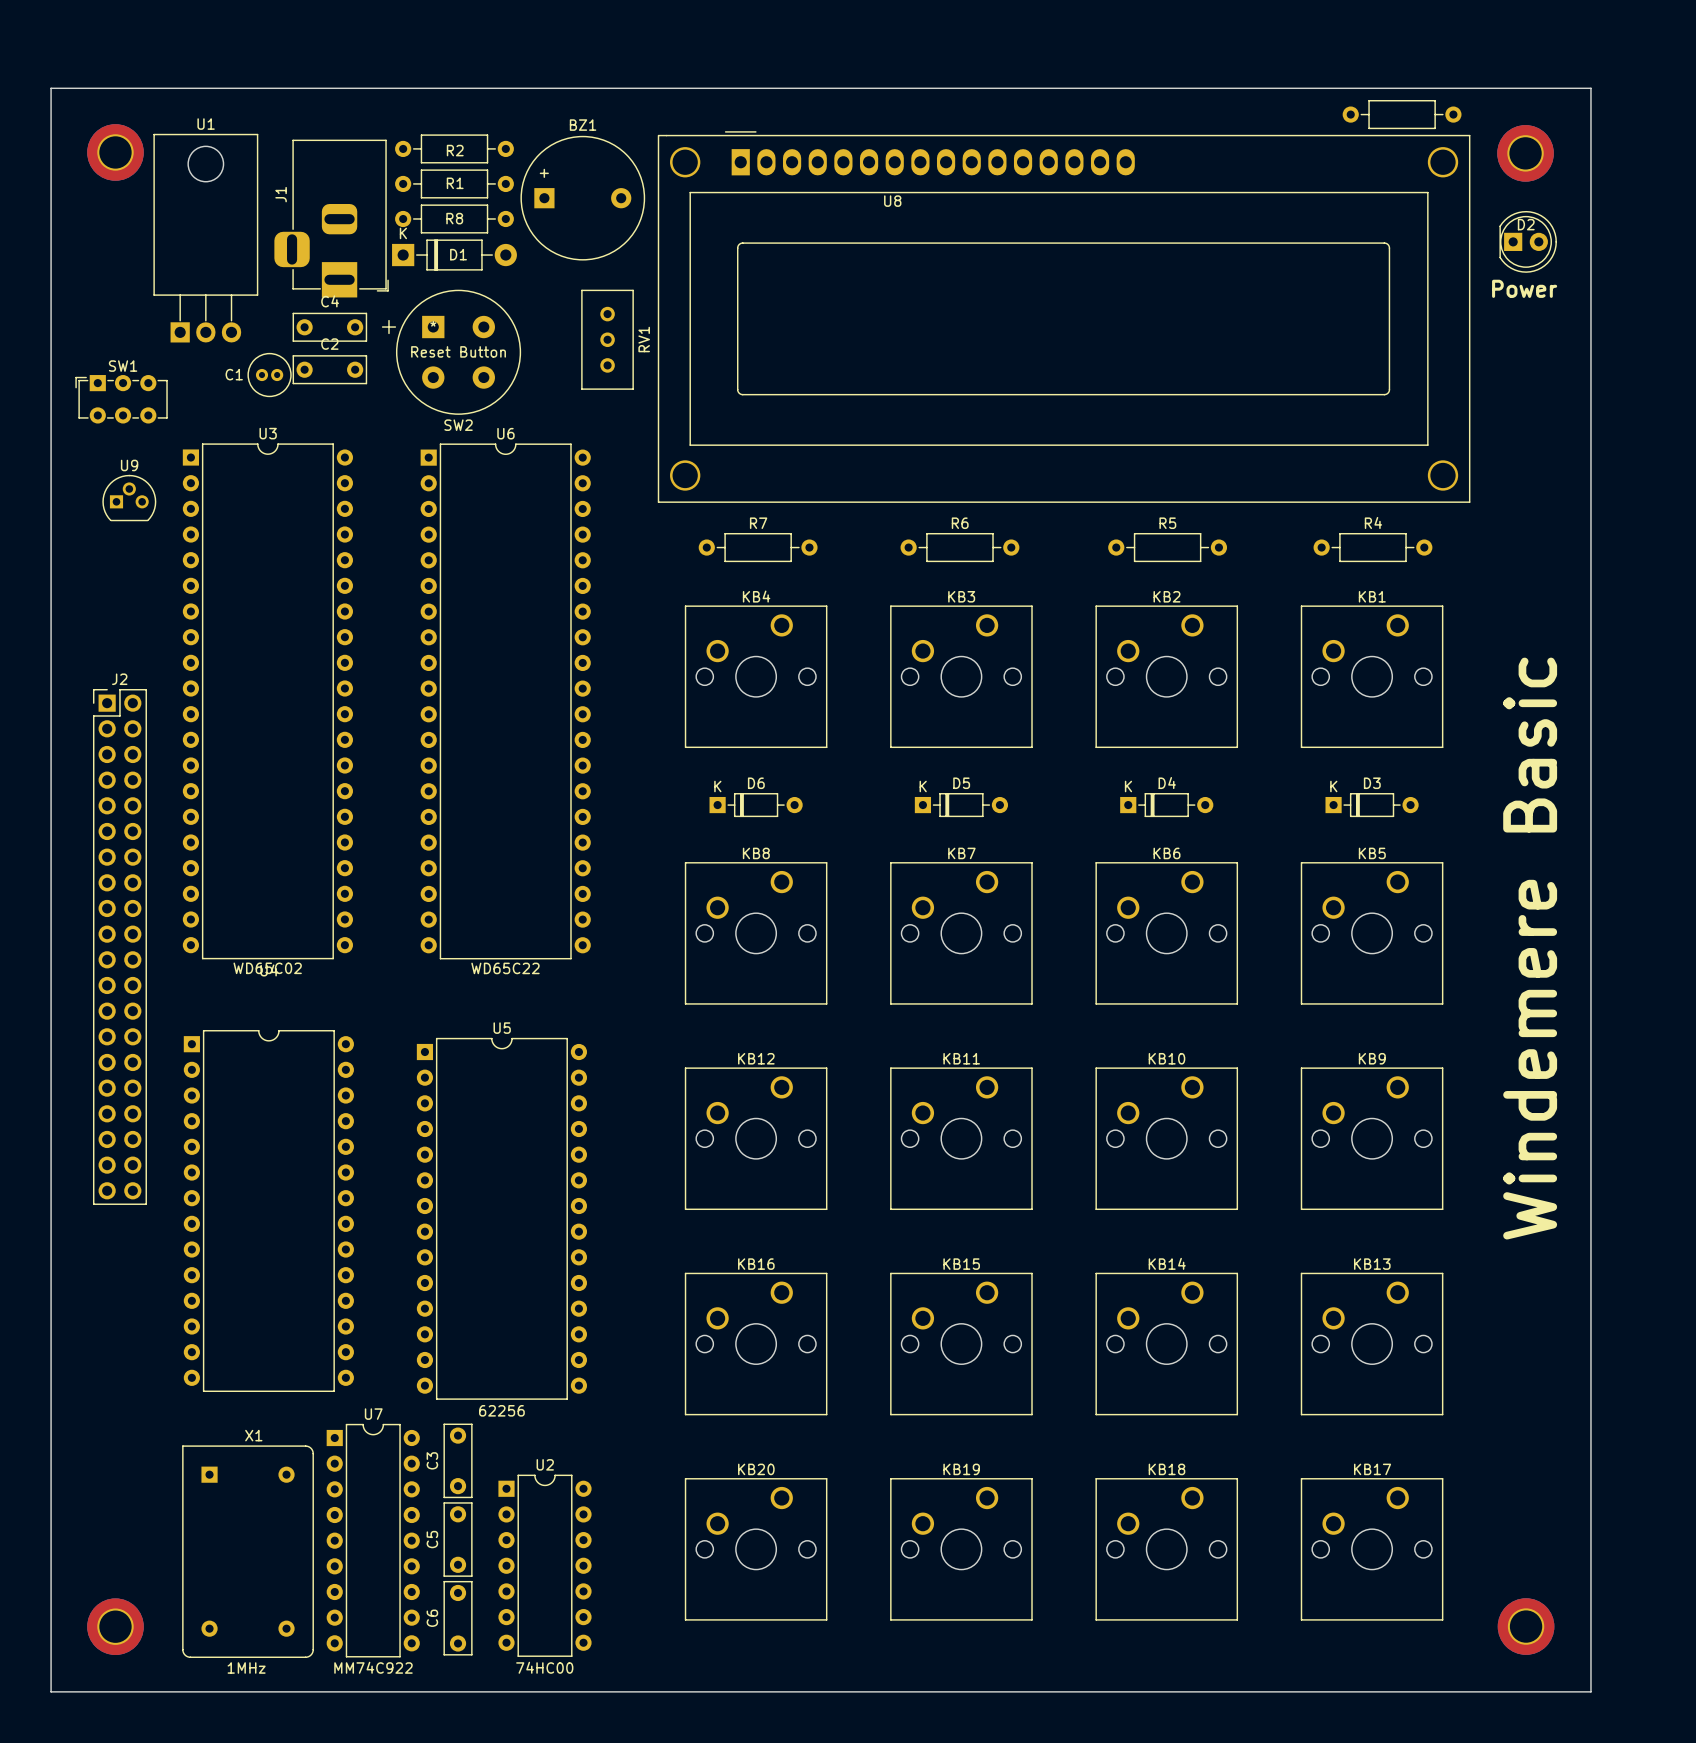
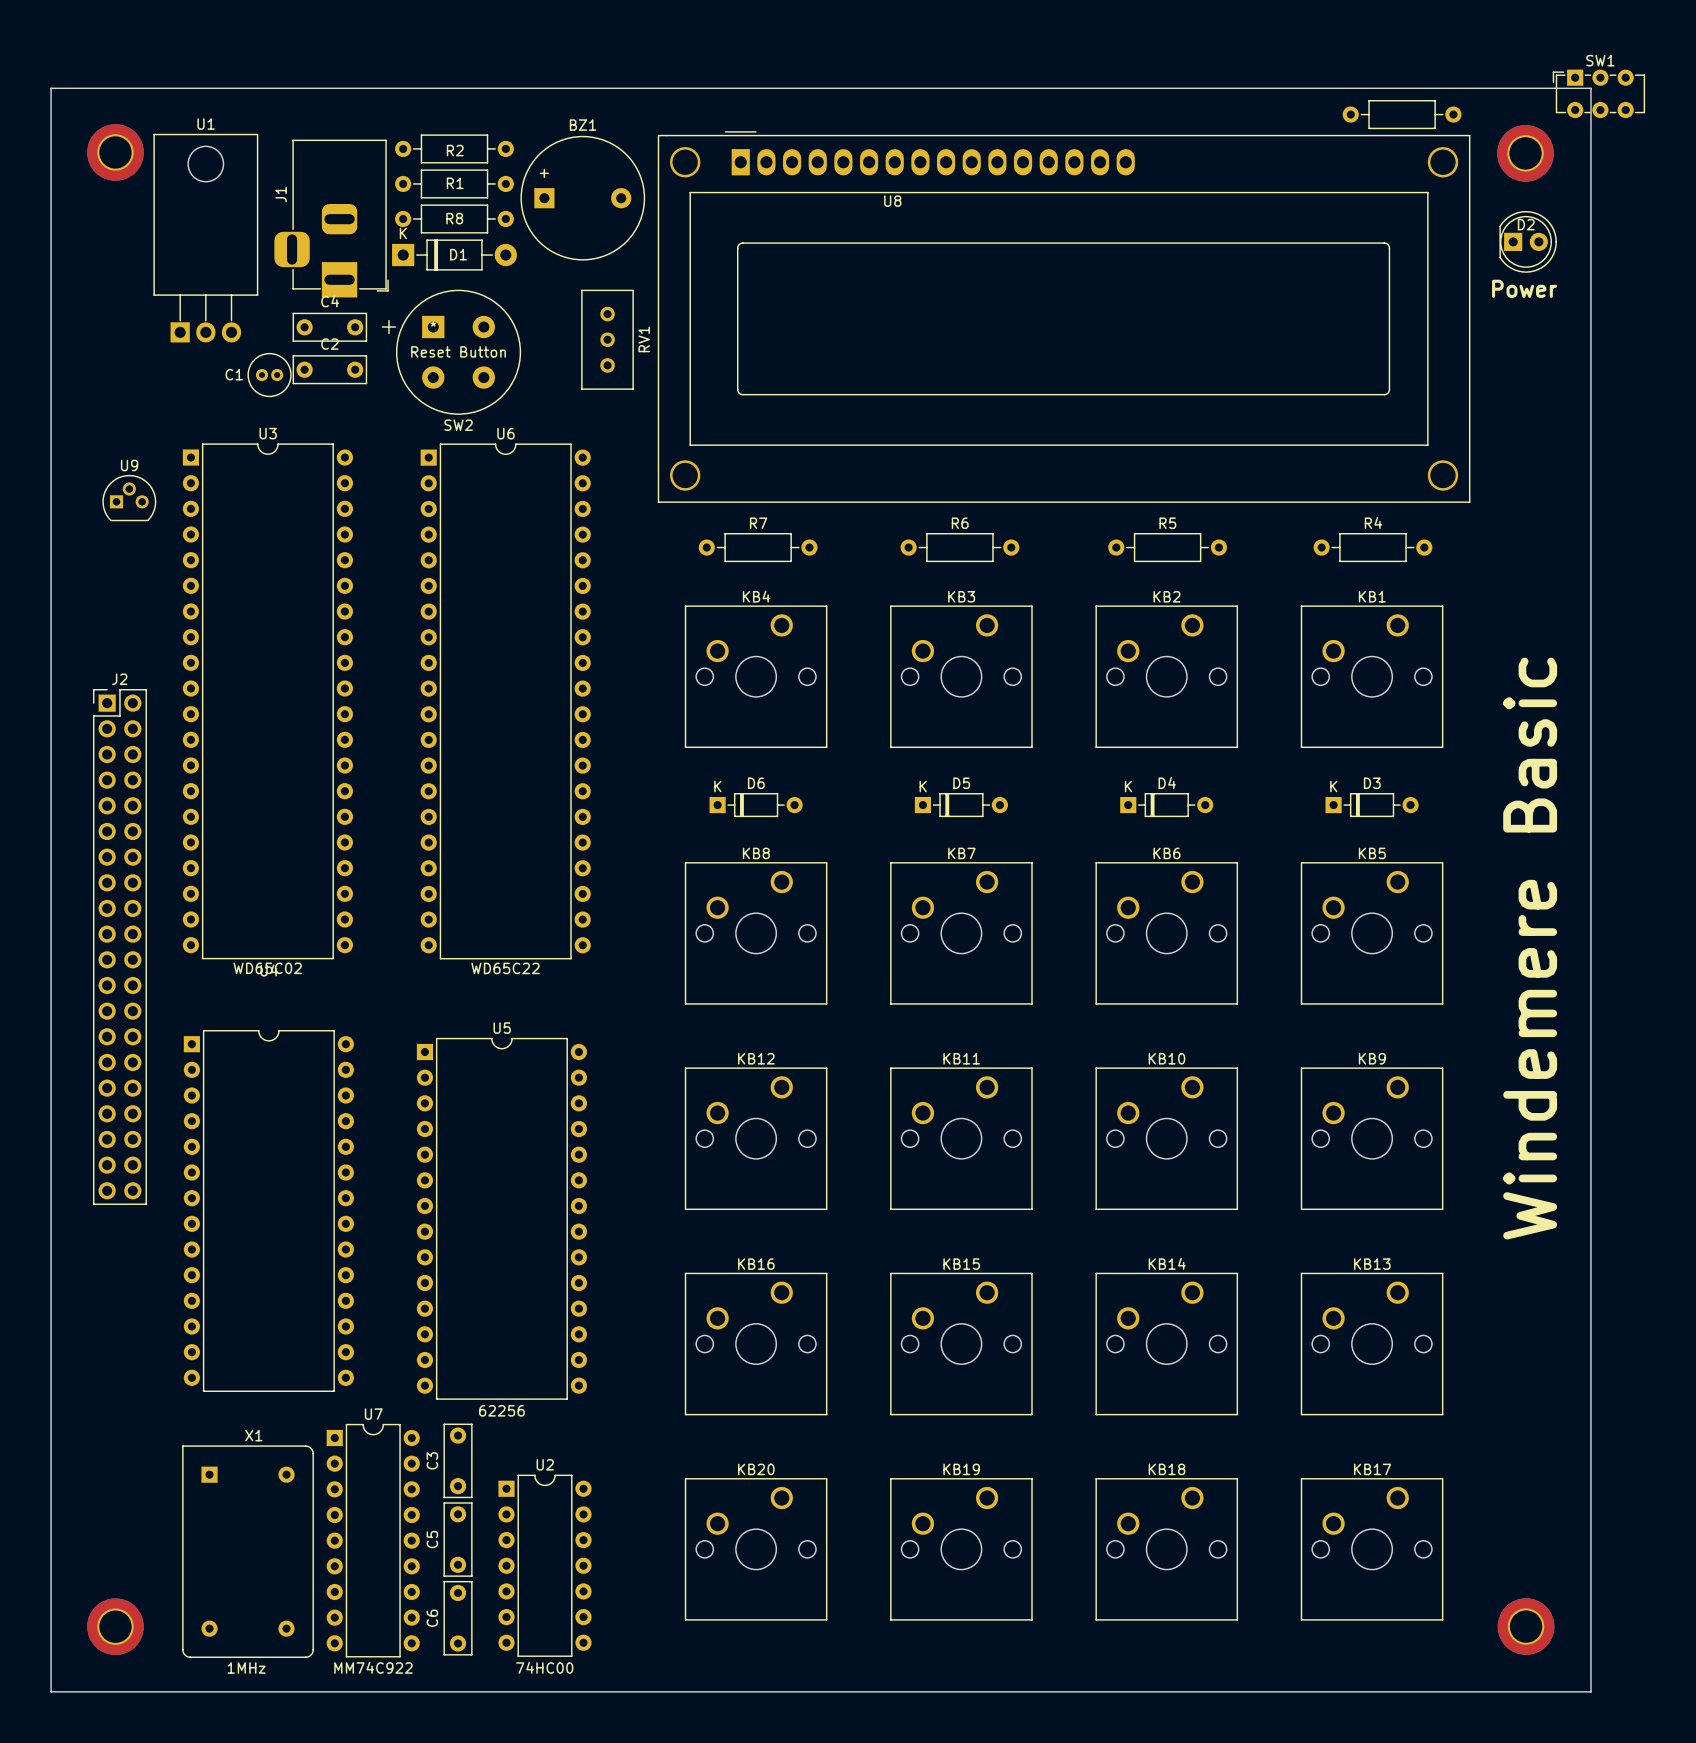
SW1 position: (121, 399) -> (1598, 93)

